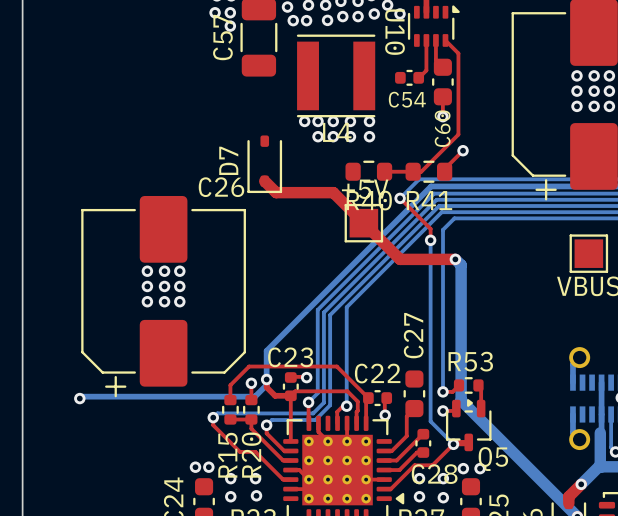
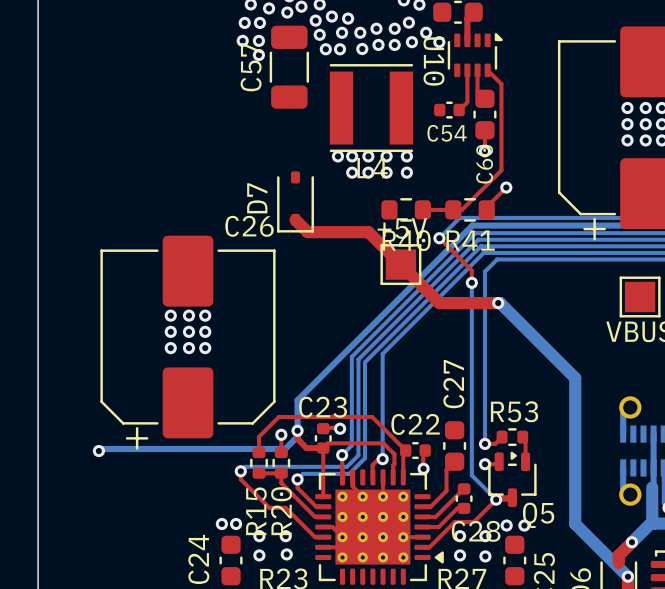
bottom track: (455, 259) (461, 265) (461, 400) (527, 467) -> (498, 303) (575, 378) (575, 524)

